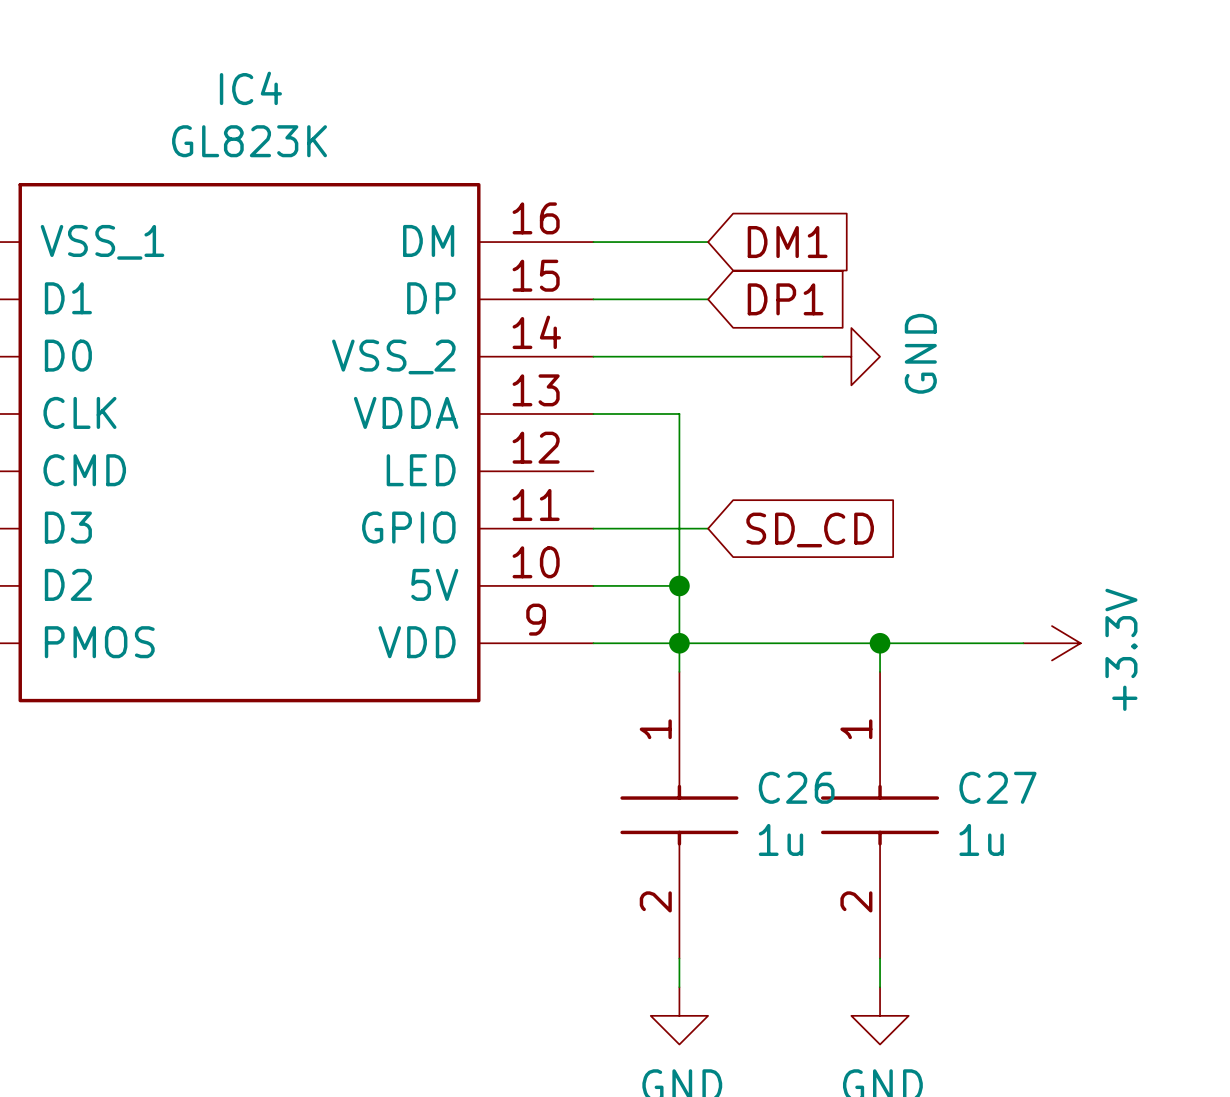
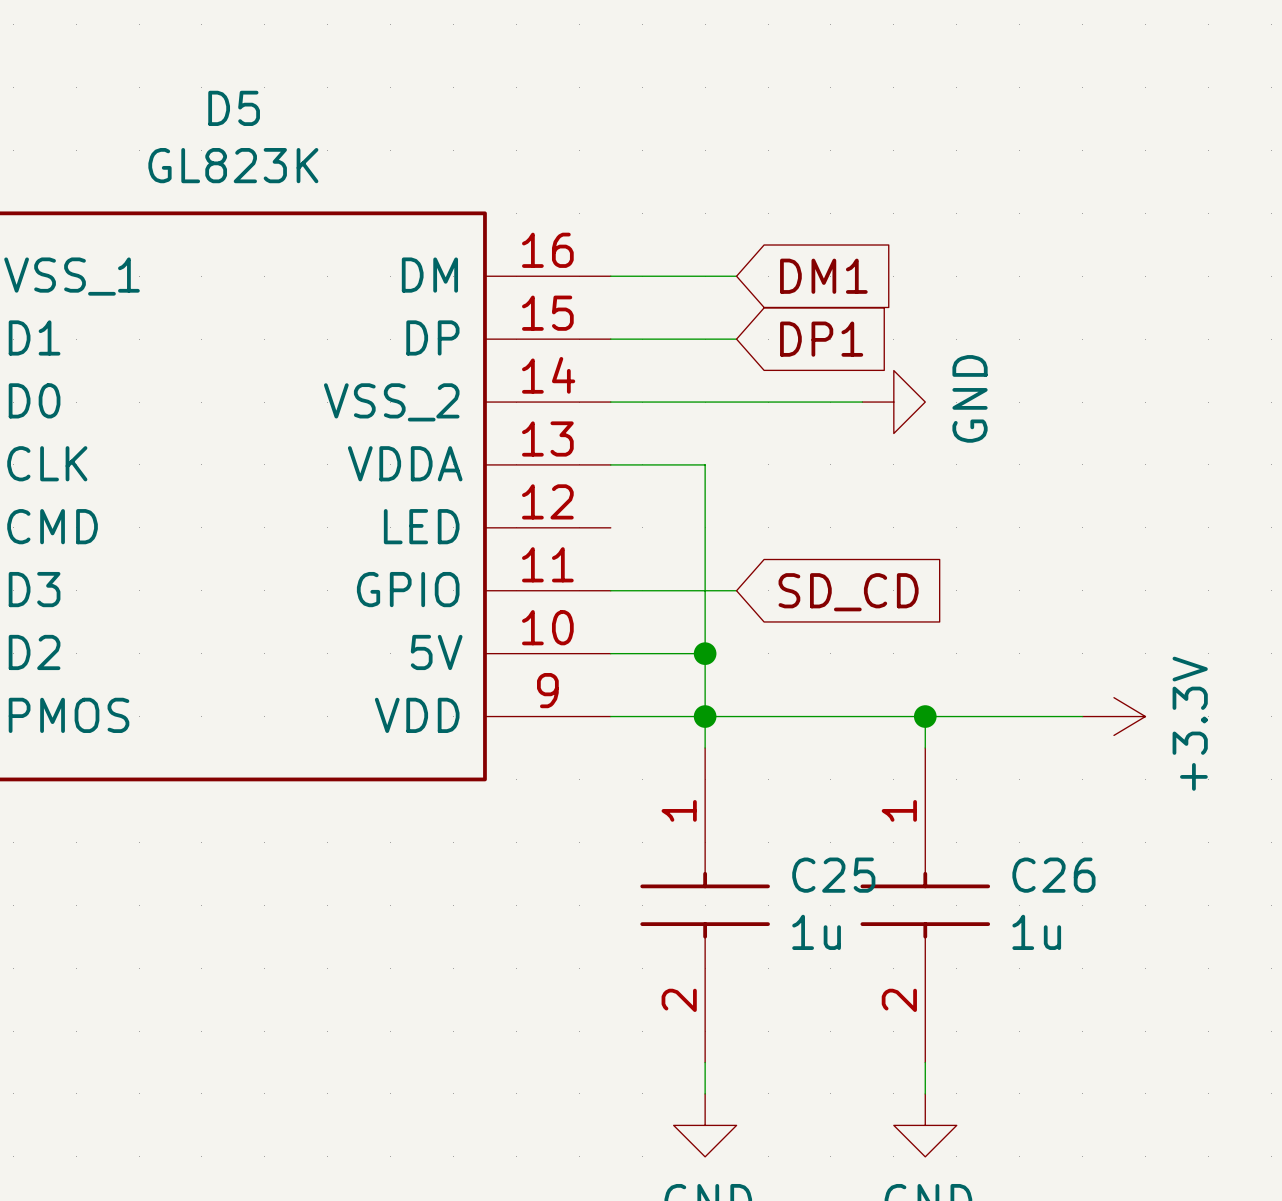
IC4 name: IC4 (250, 88) -> D5 (234, 108)
C26 name: C26 (796, 787) -> C25 (833, 875)
C27 name: C27 (997, 787) -> C26 (1053, 875)

